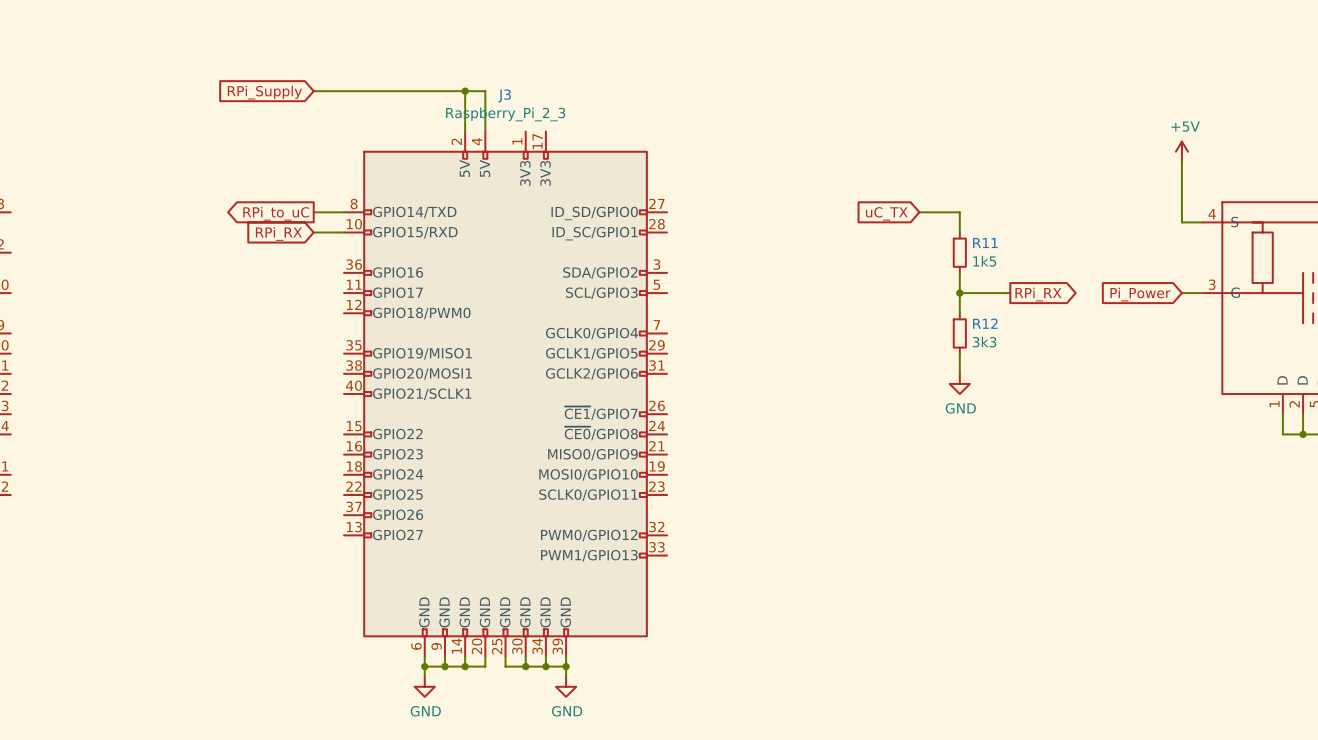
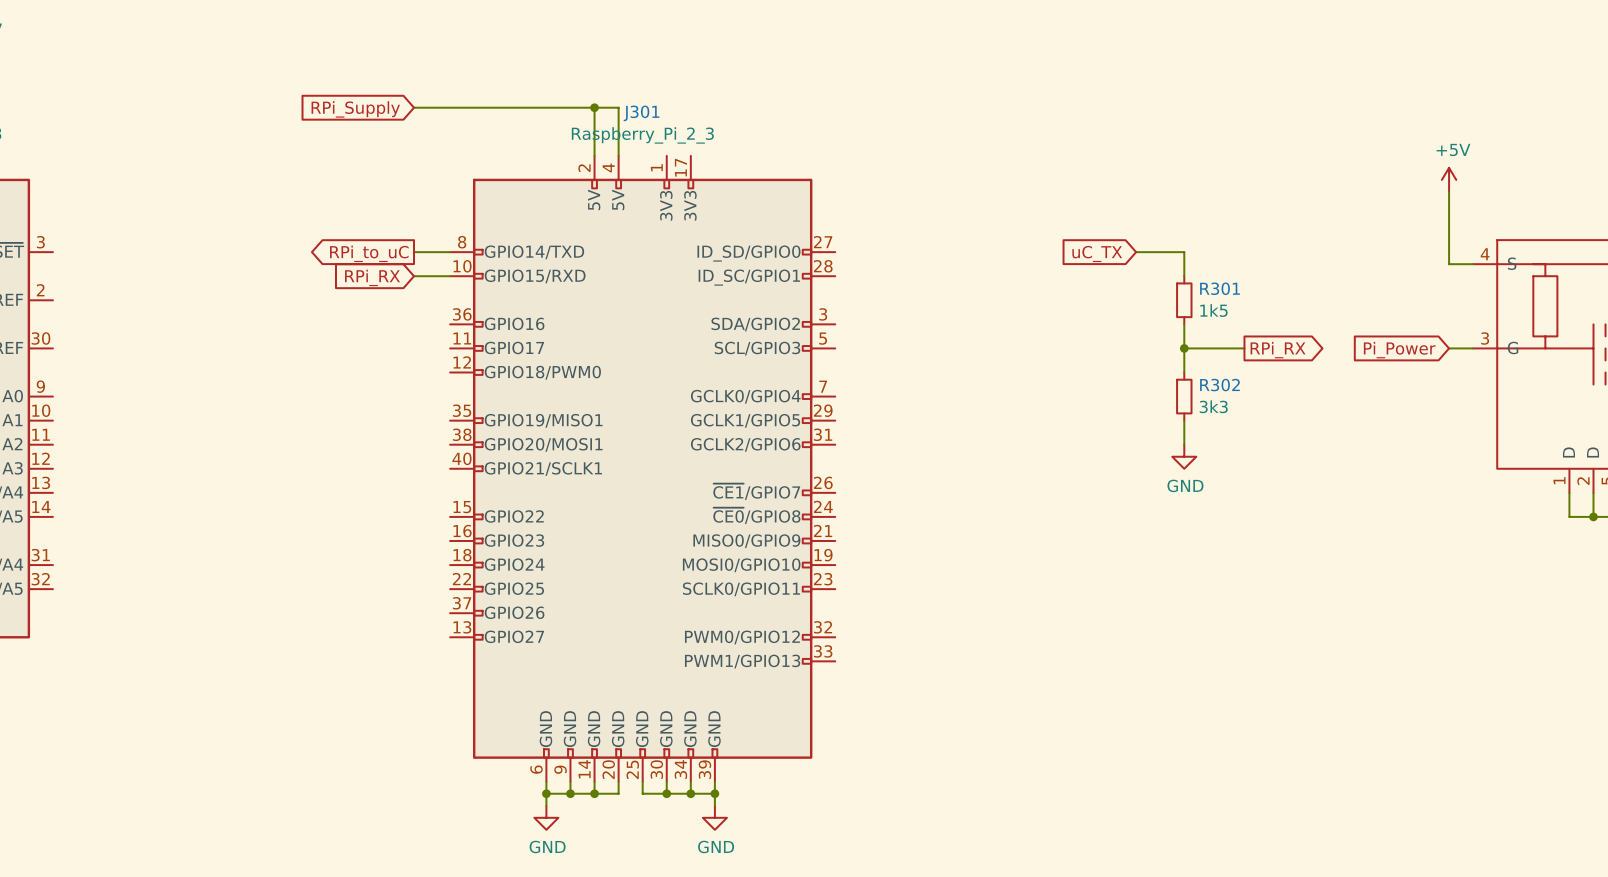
J3 name: J3 (504, 95) -> J301 (641, 113)
R11 name: R11 (985, 243) -> R301 (1220, 288)
R12 name: R12 (985, 323) -> R302 (1219, 385)

